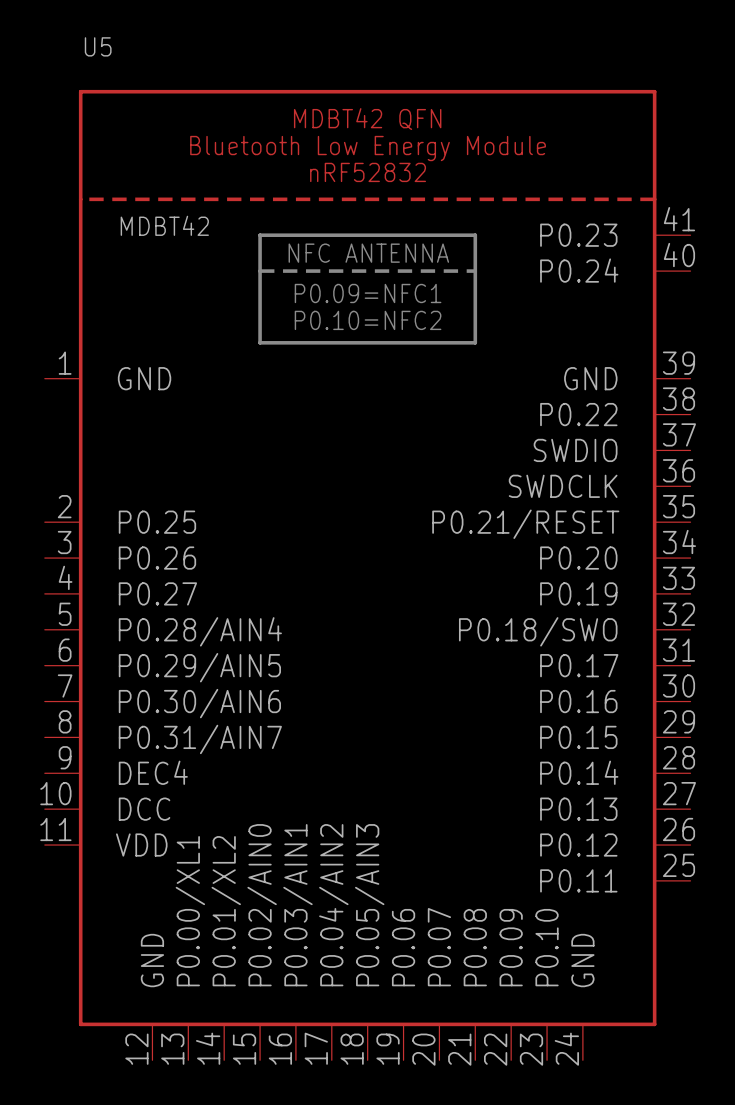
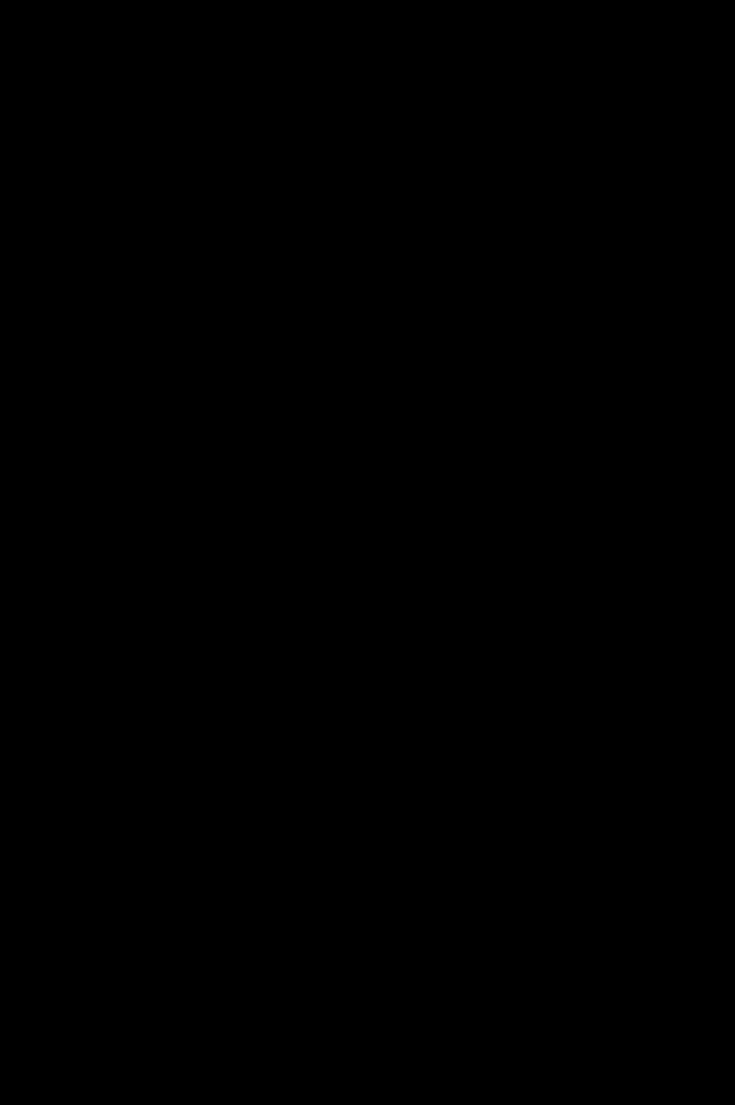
U5: MDBT42 (367, 575) -> none

